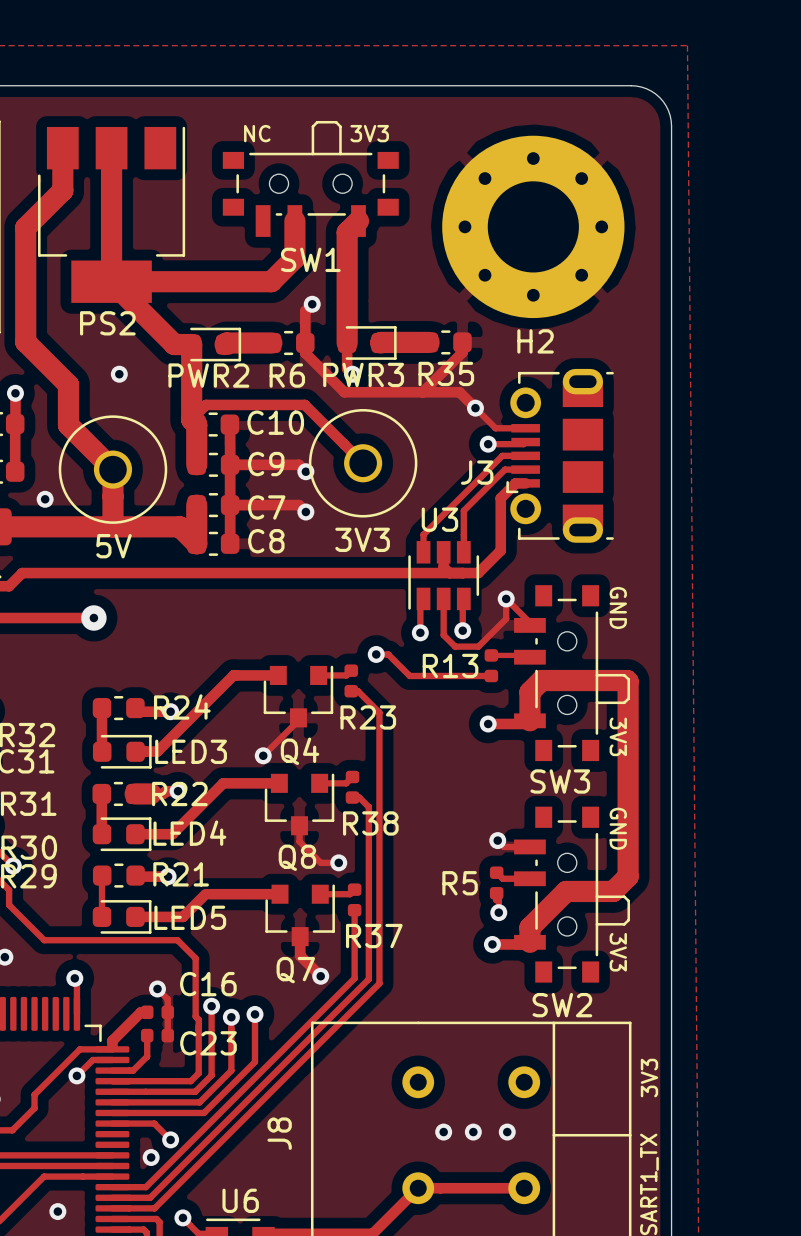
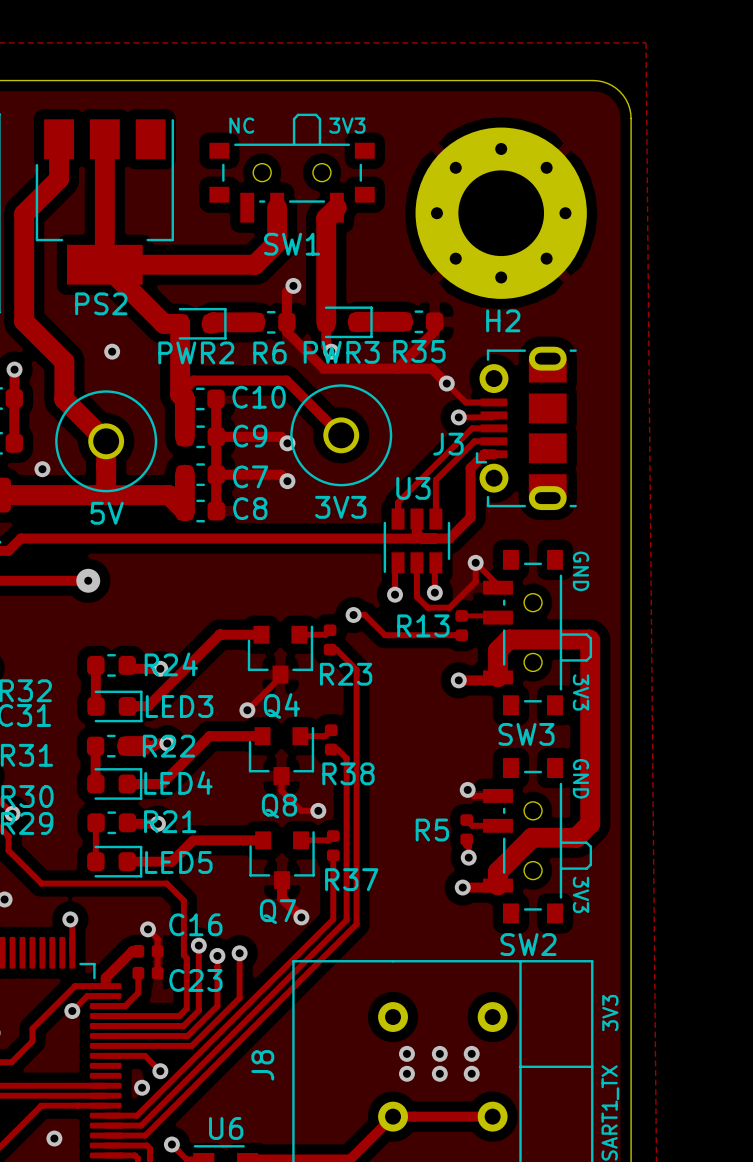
via: none -> (406, 1053)
via: none -> (439, 1053)
via: none -> (471, 1053)
via: (443, 1132) -> none
via: (473, 1132) -> none
via: (507, 1132) -> none
via: none -> (406, 1073)
via: none -> (439, 1073)
via: none -> (471, 1073)

